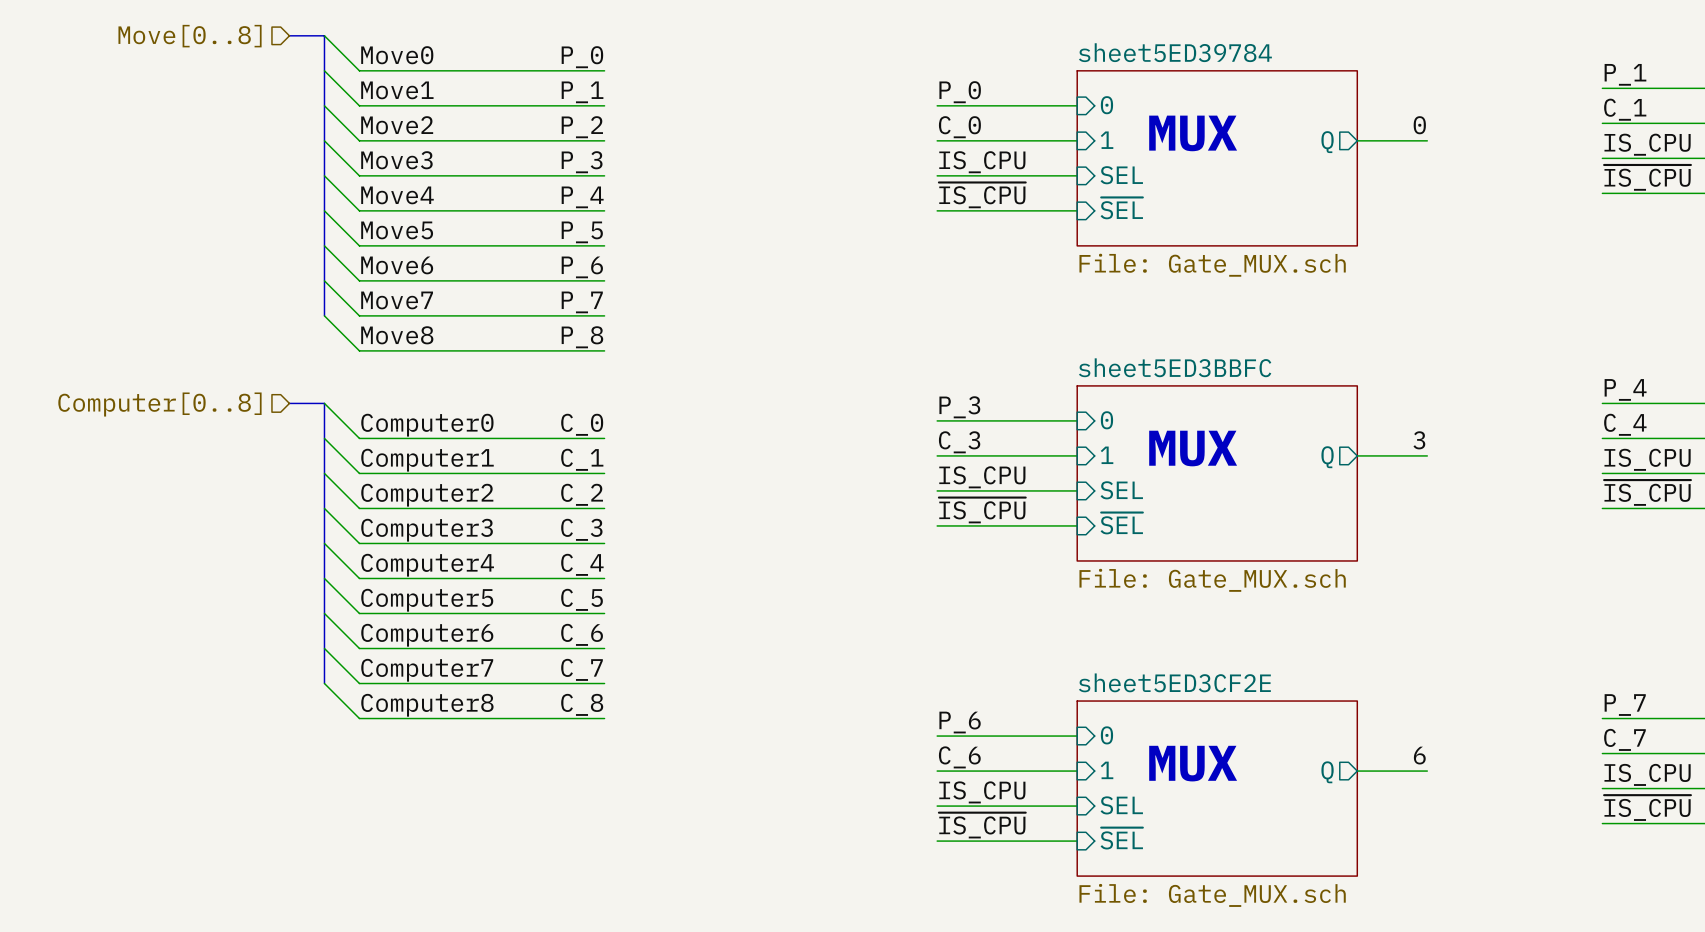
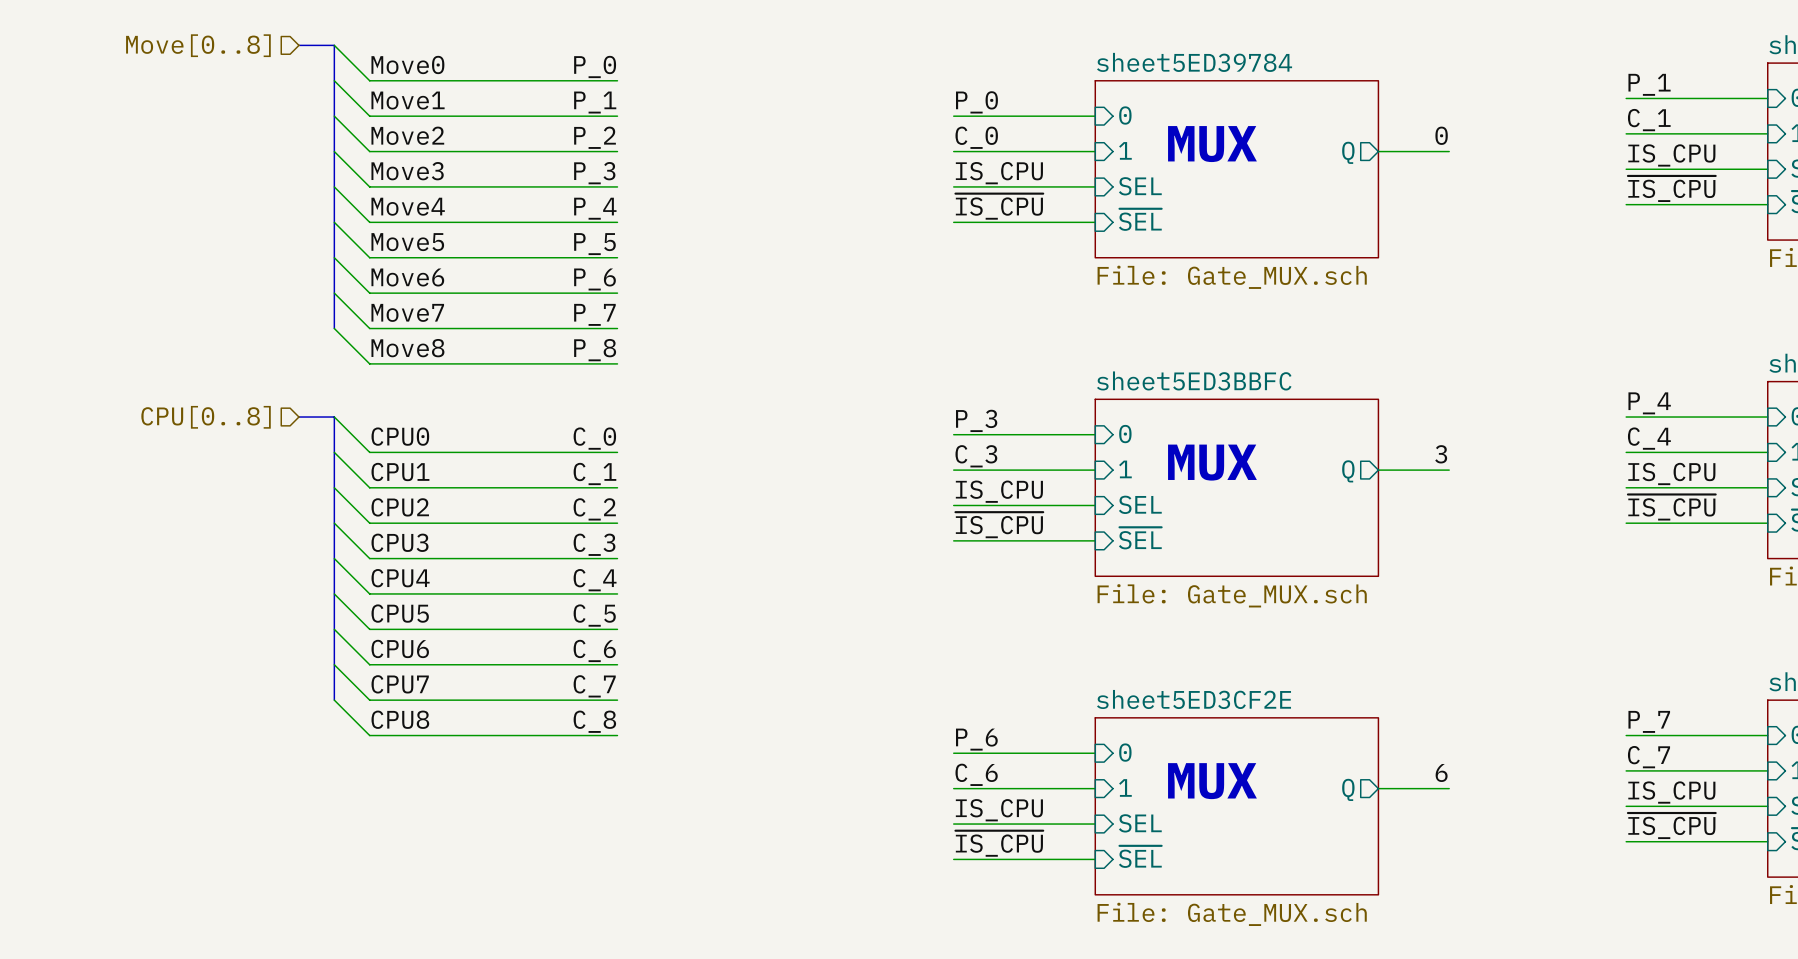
hierarchical label: Computer[0..8] (159, 404) -> CPU[0..8] (206, 417)
label: Computer0 (427, 425) -> CPU0 (400, 436)
label: Computer1 (427, 460) -> CPU1 (400, 472)
label: Computer2 (427, 495) -> CPU2 (400, 507)
label: Computer3 (427, 530) -> CPU3 (400, 542)
label: Computer4 (427, 565) -> CPU4 (400, 578)
label: Computer5 (427, 600) -> CPU5 (400, 613)
label: Computer6 (427, 635) -> CPU6 (400, 648)
label: Computer7 (427, 670) -> CPU7 (400, 684)
label: Computer8 (427, 705) -> CPU8 (400, 719)

